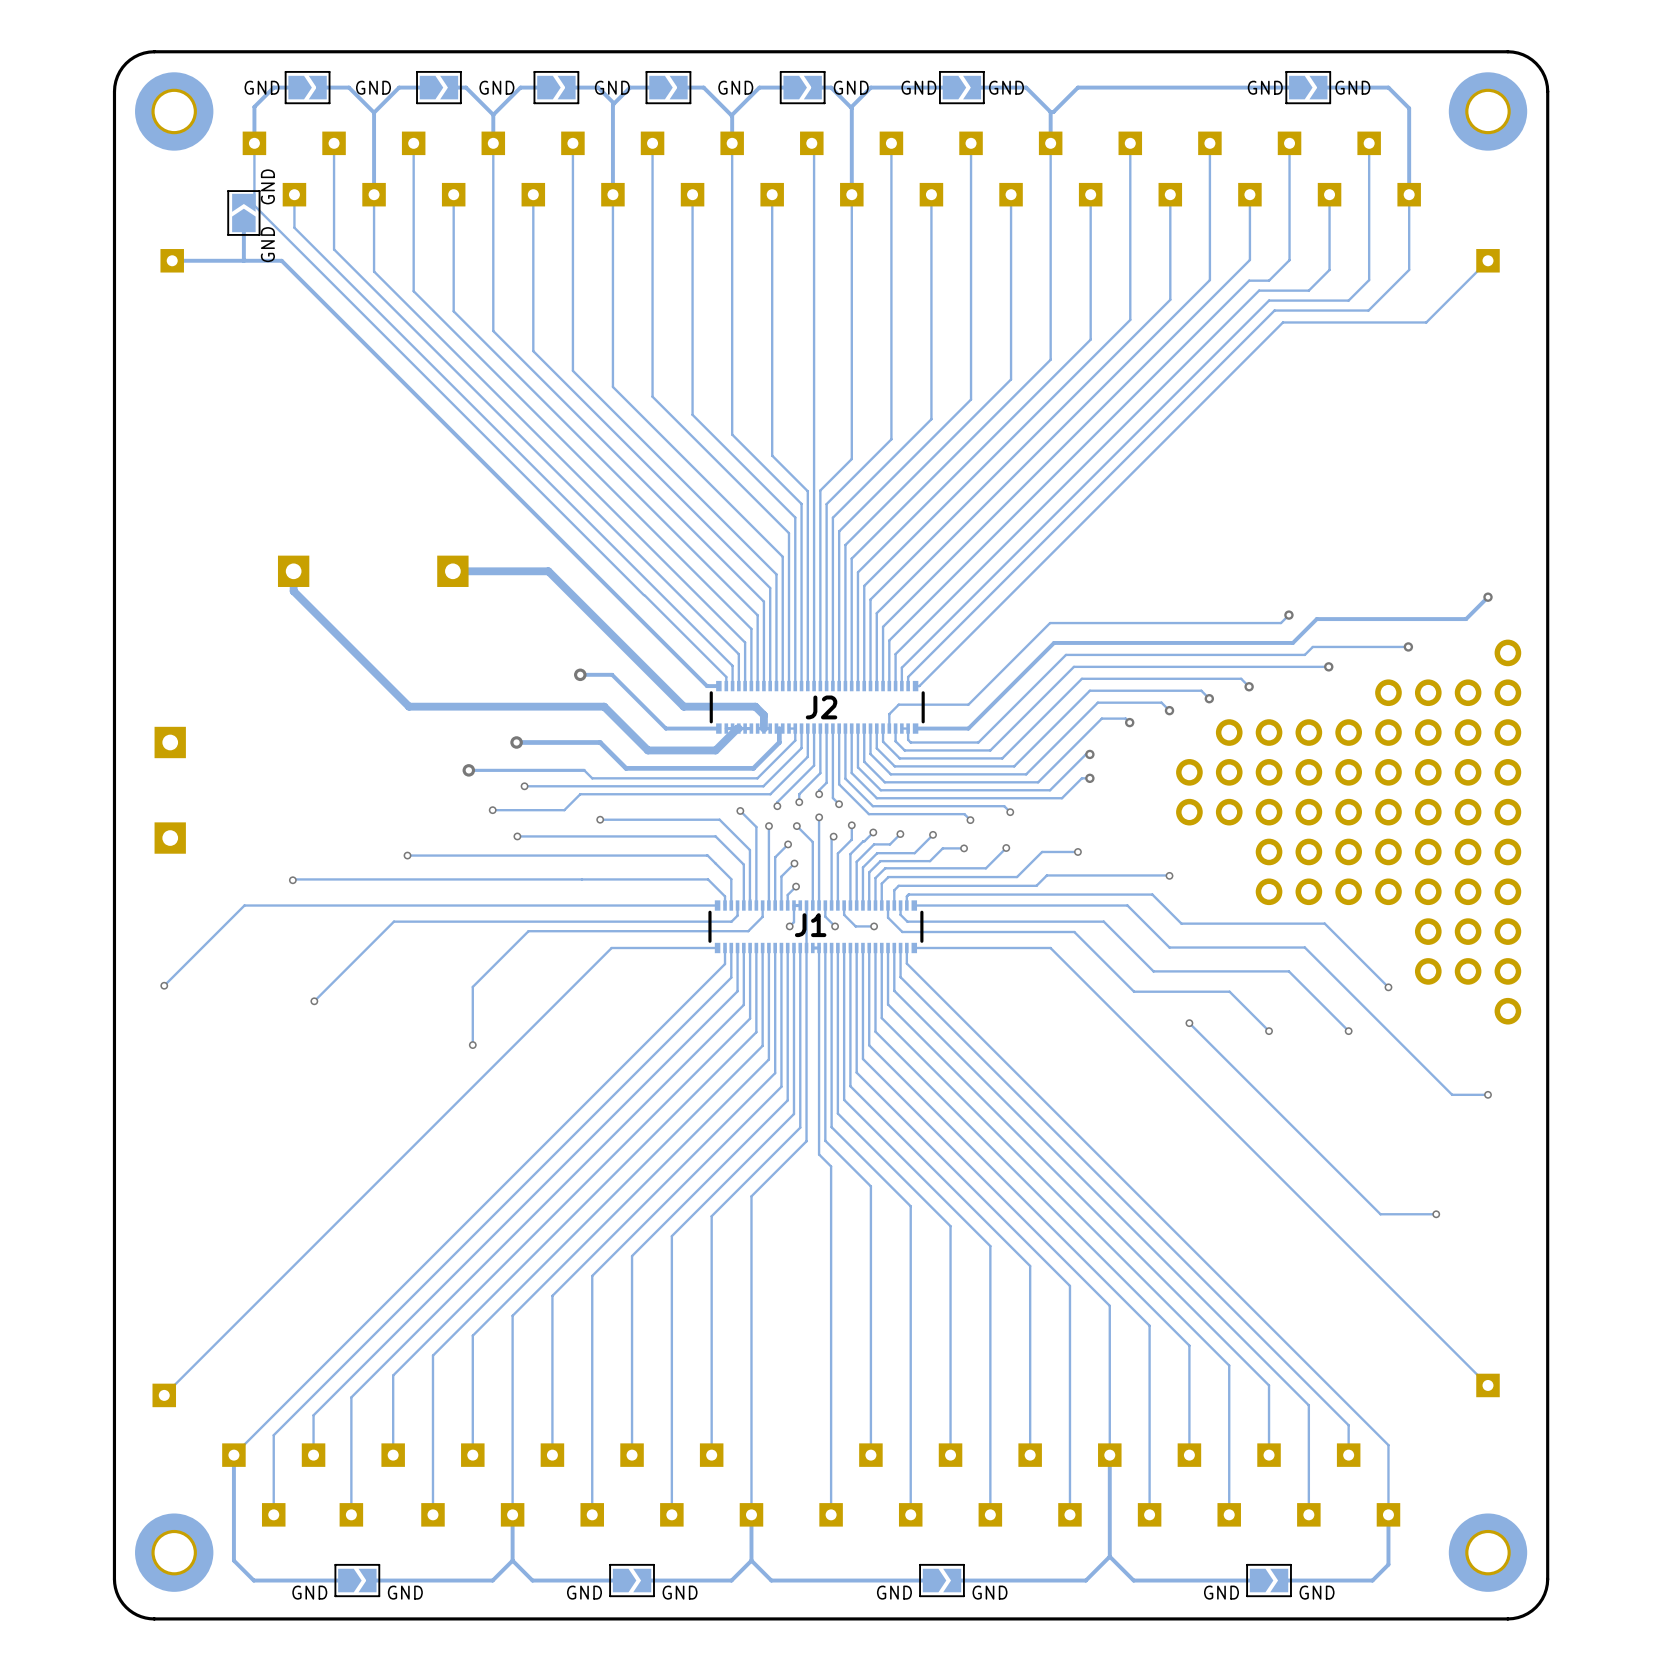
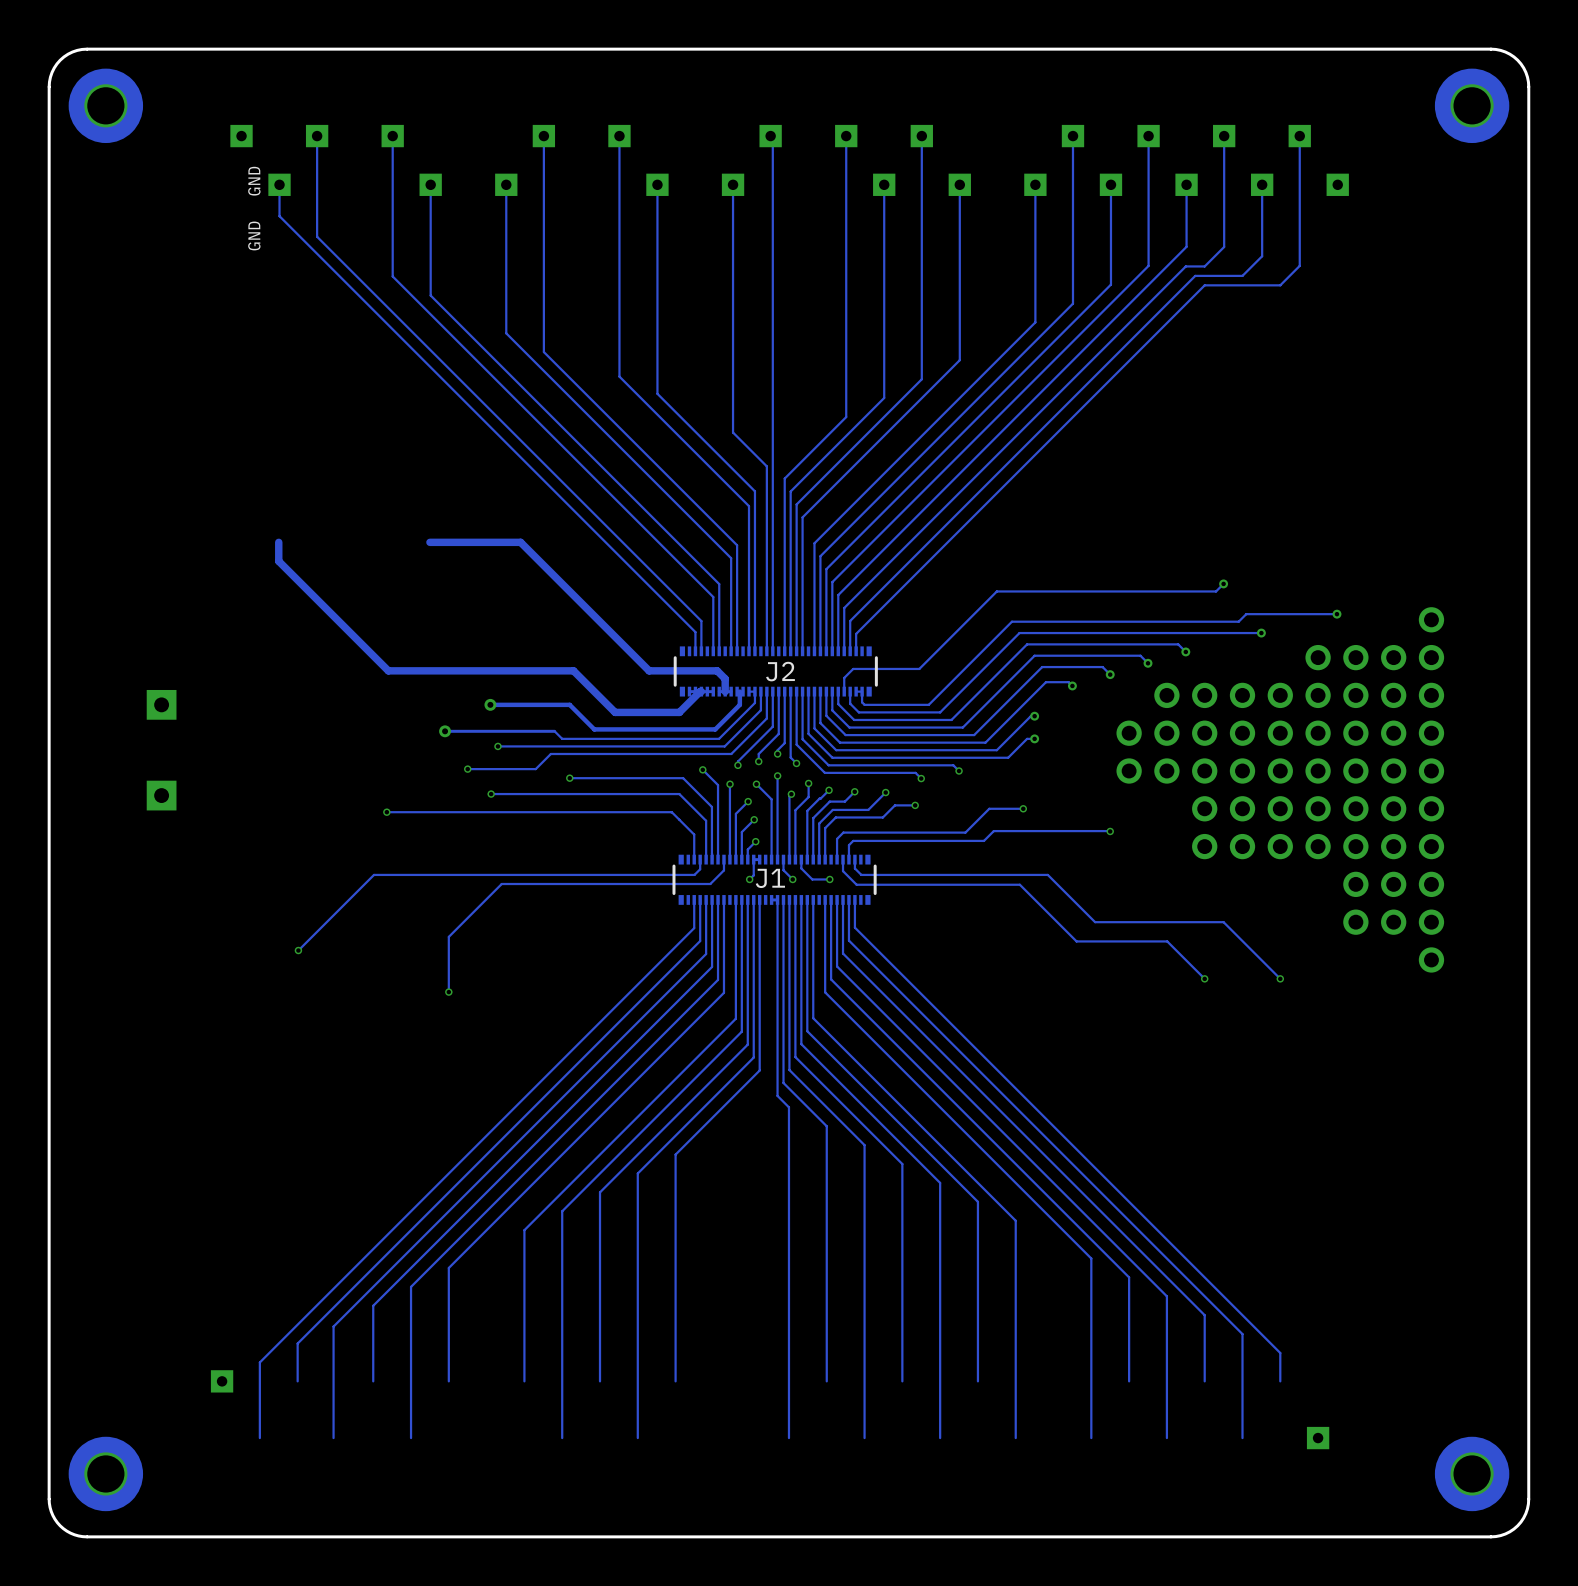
board edge: none -> (86, 49) (72, 52) (60, 60) (52, 72) (49, 86) (49, 1499) (52, 1515) (60, 1525) (74, 1534) (86, 1536)
board edge: (154, 51) (139, 54) (126, 63) (117, 76) (114, 91) (114, 1579) (116, 1592) (126, 1607) (137, 1615) (154, 1618) -> (87, 1536) (146, 1536)
board edge: none -> (146, 49) (87, 49)
board edge: (1507, 51) (1523, 54) (1536, 63) (1544, 76) (1547, 91) (1547, 1579) (1544, 1594) (1536, 1607) (1523, 1615) (1507, 1618) -> (1431, 49) (1490, 49) (1505, 52) (1520, 63) (1527, 77) (1528, 86) (1528, 1504) (1520, 1522) (1513, 1529) (1500, 1535) (1431, 1536)
text: GND (262, 87) -> none
track: (296, 87) (273, 87) (254, 106) (254, 205) (643, 595) -> none
part: (307, 87) -> none
track: (318, 87) (348, 87) (374, 112) -> none
text: GND (373, 87) -> none
track: (427, 87) (399, 87) (374, 112) -> none
part: (438, 87) -> none
track: (450, 87) (466, 87) (493, 114) -> none
text: GND (496, 87) -> none
track: (545, 87) (520, 87) (493, 114) -> none
part: (556, 87) -> none
track: (567, 87) (598, 87) (614, 103) -> none
text: GND (612, 87) -> none
track: (657, 87) (630, 87) (612, 104) (612, 386) (782, 556) (782, 686) -> none
part: (668, 87) -> none
track: (679, 87) (703, 87) (732, 116) (732, 434) (801, 503) (801, 686) -> none
text: GND (735, 87) -> none
track: (791, 87) (759, 87) (731, 115) -> none
part: (802, 87) -> none
track: (814, 87) (831, 87) (851, 108) (851, 459) (820, 490) (820, 686) -> none
text: GND (851, 87) -> none
text: GND (918, 87) -> none
track: (950, 87) (870, 87) (851, 107) -> none
part: (961, 87) -> none
track: (973, 87) (1026, 87) (1050, 112) -> none
text: GND (1006, 87) -> none
text: GND (1265, 87) -> none
track: (1296, 87) (1077, 87) (1053, 112) (1050, 112) -> none
part: (1308, 87) -> none
track: (1319, 87) (1388, 87) (1409, 108) (1409, 269) (1368, 310) (1274, 310) (908, 676) (908, 686) -> none
text: GND (1352, 87) -> none
part position: (174, 111) -> (105, 105)
part position: (1488, 111) -> (1472, 105)
track: (374, 112) (374, 271) (745, 642) (745, 686) -> none
track: (1050, 112) (1050, 359) (851, 558) (851, 686) -> none
track: (493, 114) (493, 331) (763, 601) (763, 686) -> none
part: (493, 143) -> none
part: (732, 143) -> none
part: (1050, 143) -> none
part: (374, 194) -> none
part: (612, 194) -> none
part: (851, 194) -> none
part: (243, 212) -> none
track: (243, 224) (243, 260) -> none
track: (172, 260) (281, 260) (707, 686) (718, 686) -> none
part: (172, 260) -> none
track: (1488, 260) (1426, 322) (1282, 322) (919, 686) (915, 686) -> none
part: (1488, 260) -> none
part: (293, 571) -> none
part: (452, 571) -> none
track: (644, 595) (726, 676) (726, 686) -> none
track: (1488, 597) (1466, 619) (1316, 619) (1292, 642) (1054, 642) (968, 728) (915, 728) -> none
via: (1488, 597) -> none
track: (580, 674) (612, 674) (665, 728) (718, 728) -> none
via: (580, 674) -> none
track: (1006, 847) (985, 868) (885, 868) (875, 878) (875, 905) -> none
via: (1006, 847) -> none
track: (292, 880) (708, 879) (725, 896) (725, 905) -> none
via: (292, 880) -> none
track: (717, 905) (244, 905) (164, 985) -> none
track: (806, 905) (806, 1141) (751, 1196) (751, 1560) -> none
track: (906, 905) (906, 896) (908, 894) (1152, 894) (1181, 923) (1324, 923) (1388, 987) -> none
track: (914, 905) (1127, 905) (1169, 947) (1304, 947) (1452, 1094) (1488, 1094) -> none
track: (717, 947) (611, 947) (164, 1395) -> none
track: (725, 947) (725, 964) (233, 1455) (233, 1560) (253, 1580) (345, 1580) -> none
track: (768, 947) (768, 1059) (512, 1315) (512, 1560) -> none
track: (862, 947) (862, 1059) (1109, 1305) (1109, 1556) -> none
track: (906, 947) (906, 963) (1388, 1445) (1388, 1564) (1372, 1580) (1280, 1580) -> none
track: (914, 947) (1050, 947) (1488, 1385) -> none
via: (164, 985) -> none
via: (1388, 987) -> none
track: (1189, 1023) (1380, 1214) (1436, 1214) -> none
via: (1189, 1023) -> none
via: (1488, 1094) -> none
via: (1436, 1214) -> none
part: (1488, 1385) -> none
part: (164, 1395) -> none
part: (313, 1455) -> none
part: (393, 1455) -> none
part: (472, 1455) -> none
part: (552, 1455) -> none
part: (632, 1455) -> none
part: (711, 1455) -> none
part: (870, 1455) -> none
part: (950, 1455) -> none
part: (1030, 1455) -> none
part: (1109, 1455) -> none
part: (1189, 1455) -> none
part: (1269, 1455) -> none
part: (1348, 1455) -> none
part: (273, 1514) -> none
part: (351, 1514) -> none
part: (432, 1514) -> none
part: (512, 1514) -> none
part: (592, 1514) -> none
part: (671, 1514) -> none
part: (751, 1514) -> none
part: (831, 1514) -> none
part: (910, 1514) -> none
part: (990, 1514) -> none
part: (1069, 1514) -> none
part: (1149, 1514) -> none
part: (1229, 1514) -> none
part: (1308, 1514) -> none
part position: (174, 1552) -> (105, 1473)
part position: (1488, 1552) -> (1472, 1473)
track: (1109, 1556) (1133, 1580) (1257, 1580) -> none
track: (1109, 1556) (1085, 1580) (953, 1580) -> none
track: (512, 1560) (532, 1580) (620, 1580) -> none
track: (512, 1560) (492, 1580) (368, 1580) -> none
track: (751, 1560) (771, 1580) (930, 1580) -> none
track: (751, 1560) (731, 1580) (643, 1580) -> none
part: (357, 1580) -> none
part: (632, 1580) -> none
part: (941, 1580) -> none
part: (1269, 1580) -> none
text: GND (309, 1592) -> none
text: GND (405, 1592) -> none
text: GND (584, 1592) -> none
text: GND (680, 1592) -> none
text: GND (894, 1592) -> none
text: GND (990, 1592) -> none
text: GND (1221, 1592) -> none
text: GND (1317, 1592) -> none

